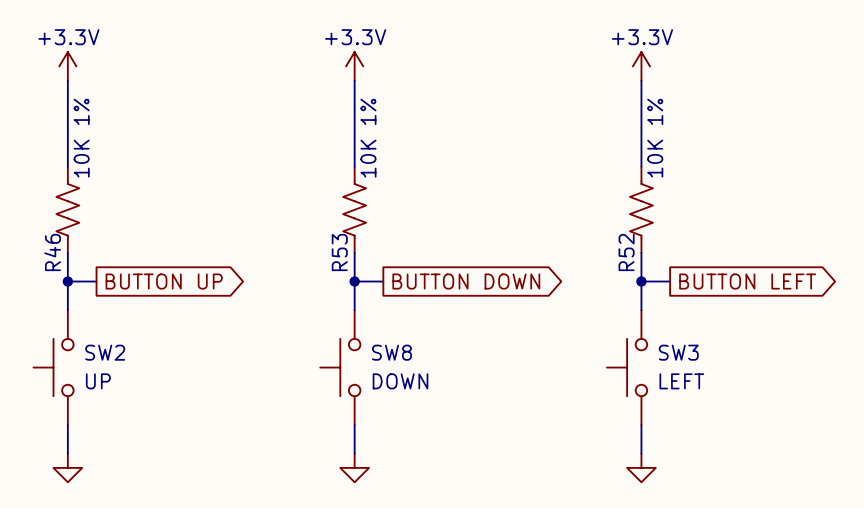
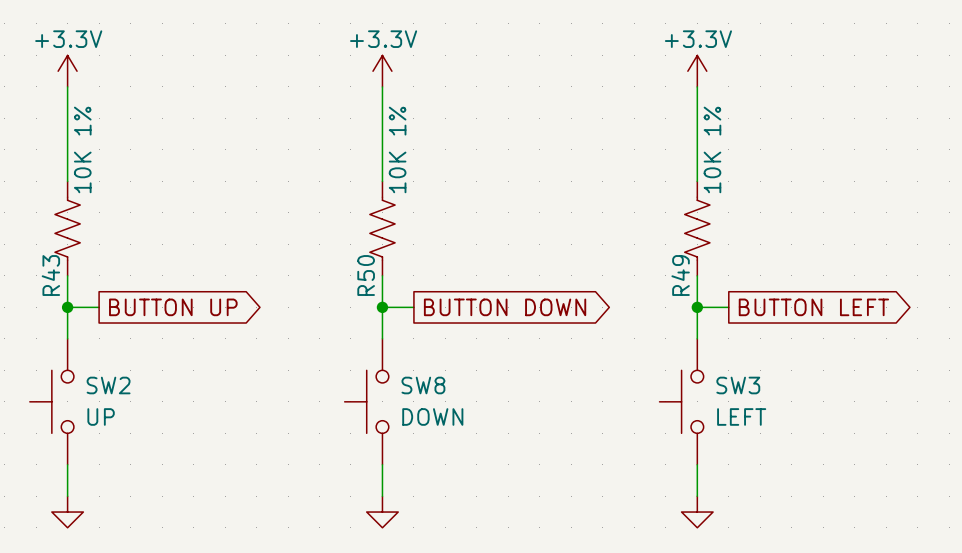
R46 name: R46 (52, 252) -> R43 (50, 275)
R53 name: R53 (339, 252) -> R50 (366, 275)
R52 name: R52 (626, 252) -> R49 (680, 275)

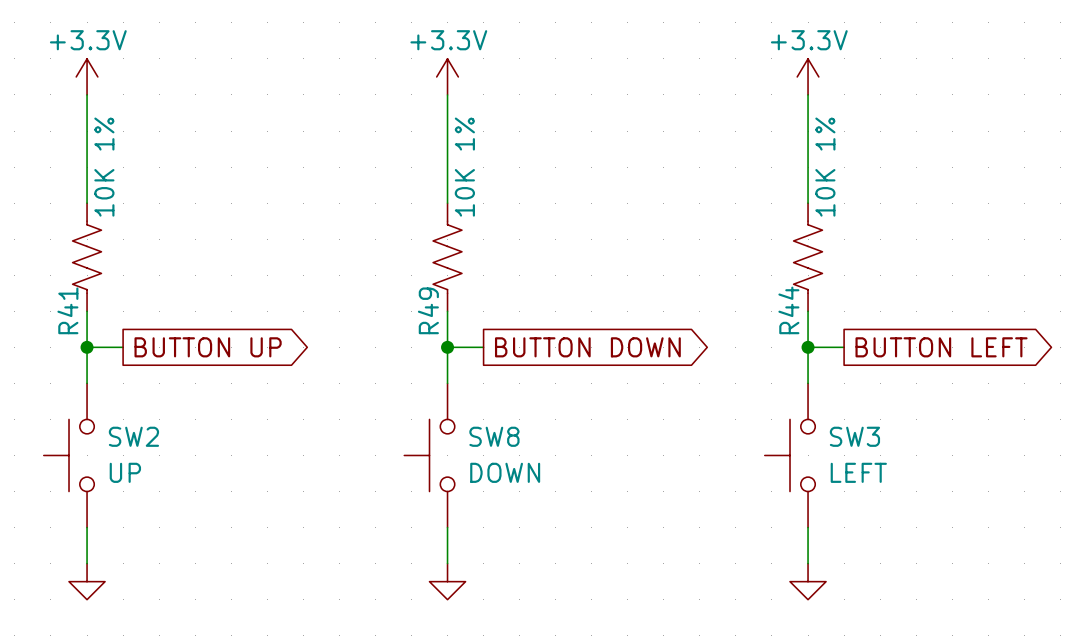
R43 name: R43 (50, 275) -> R41 (67, 310)
R50 name: R50 (366, 275) -> R49 (428, 310)
R49 name: R49 (680, 275) -> R44 (788, 310)

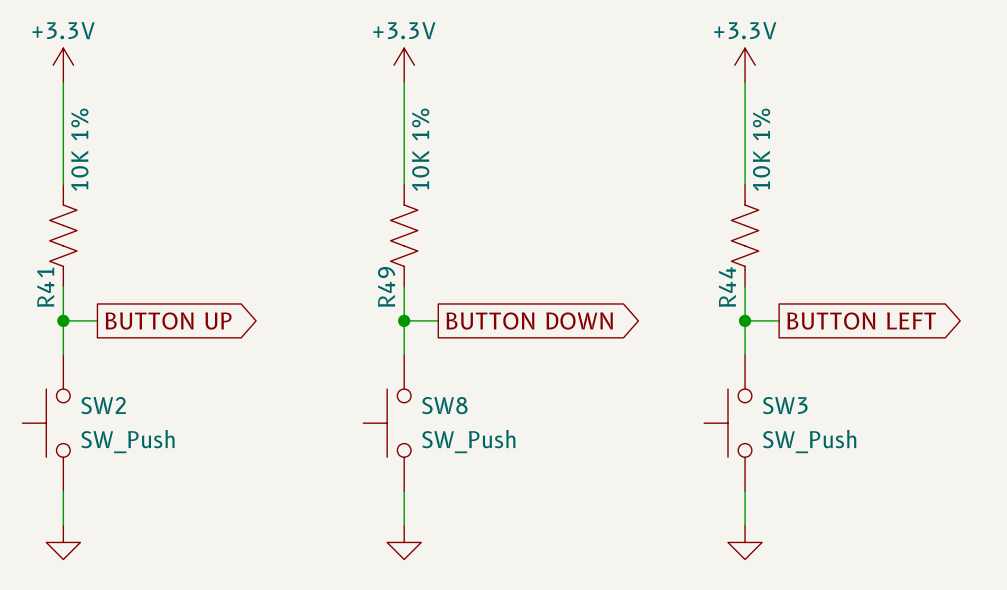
SW2 value: UP (125, 472) -> SW_Push (127, 441)
SW8 value: DOWN (505, 472) -> SW_Push (468, 441)
SW3 value: LEFT (858, 472) -> SW_Push (809, 441)

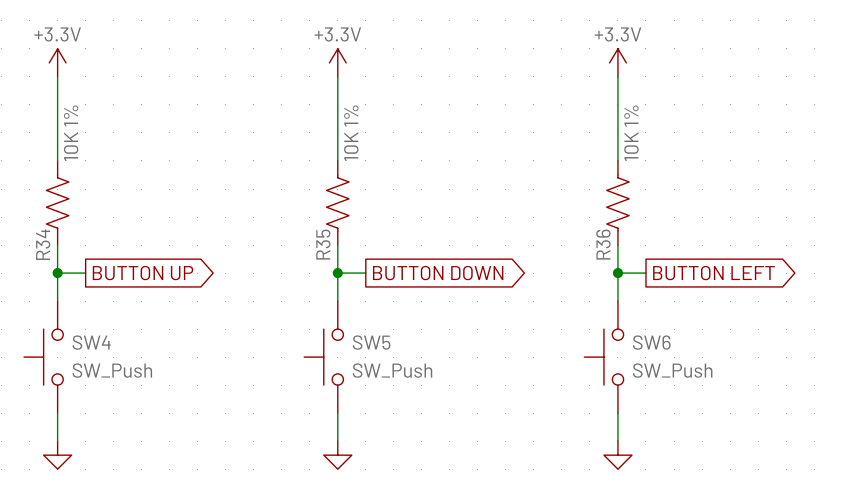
R49 name: R49 (386, 286) -> R35 (323, 244)
R41 name: R41 (45, 287) -> R34 (43, 244)
R44 name: R44 (727, 287) -> R36 (603, 244)
SW2 name: SW2 (103, 405) -> SW4 (91, 342)
SW8 name: SW8 (444, 405) -> SW5 (371, 342)
SW3 name: SW3 (785, 405) -> SW6 (651, 342)

